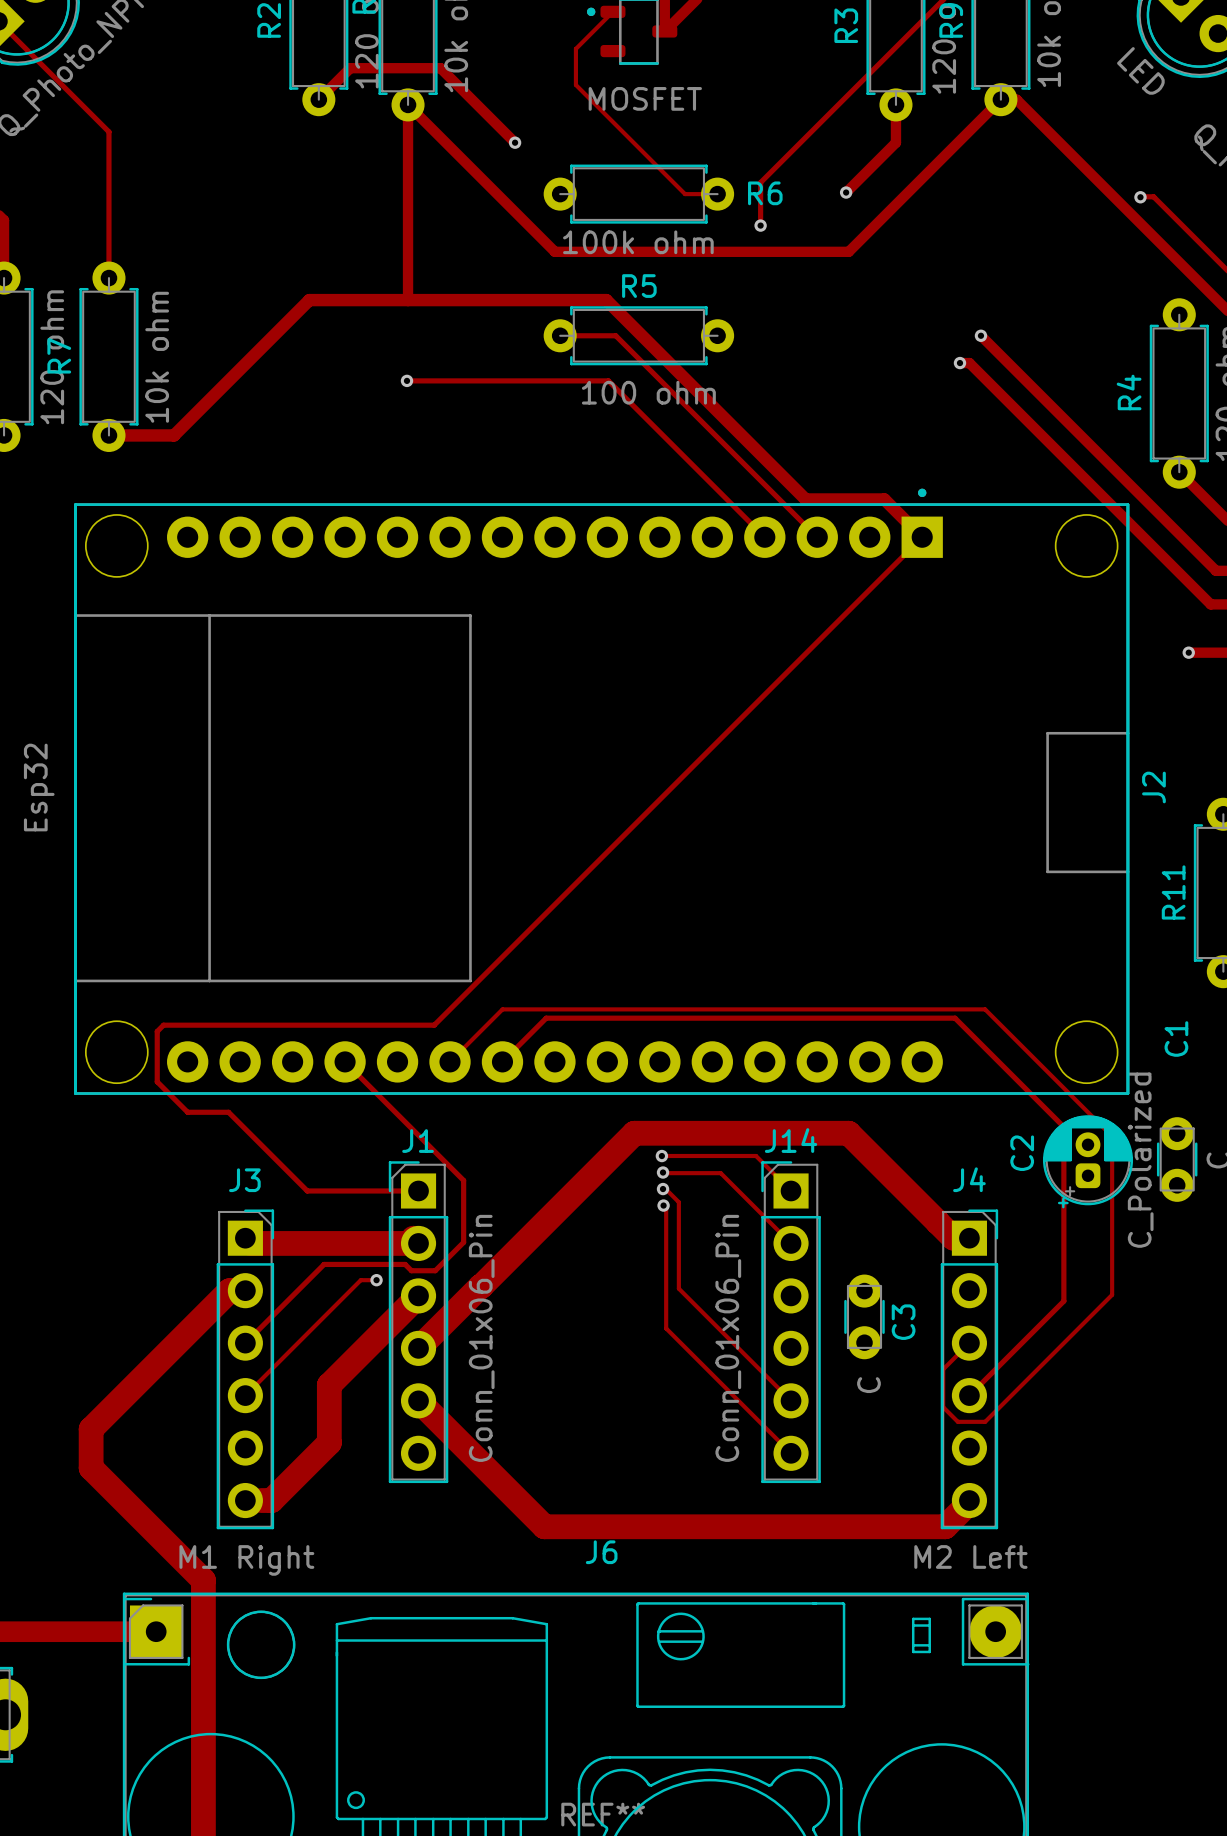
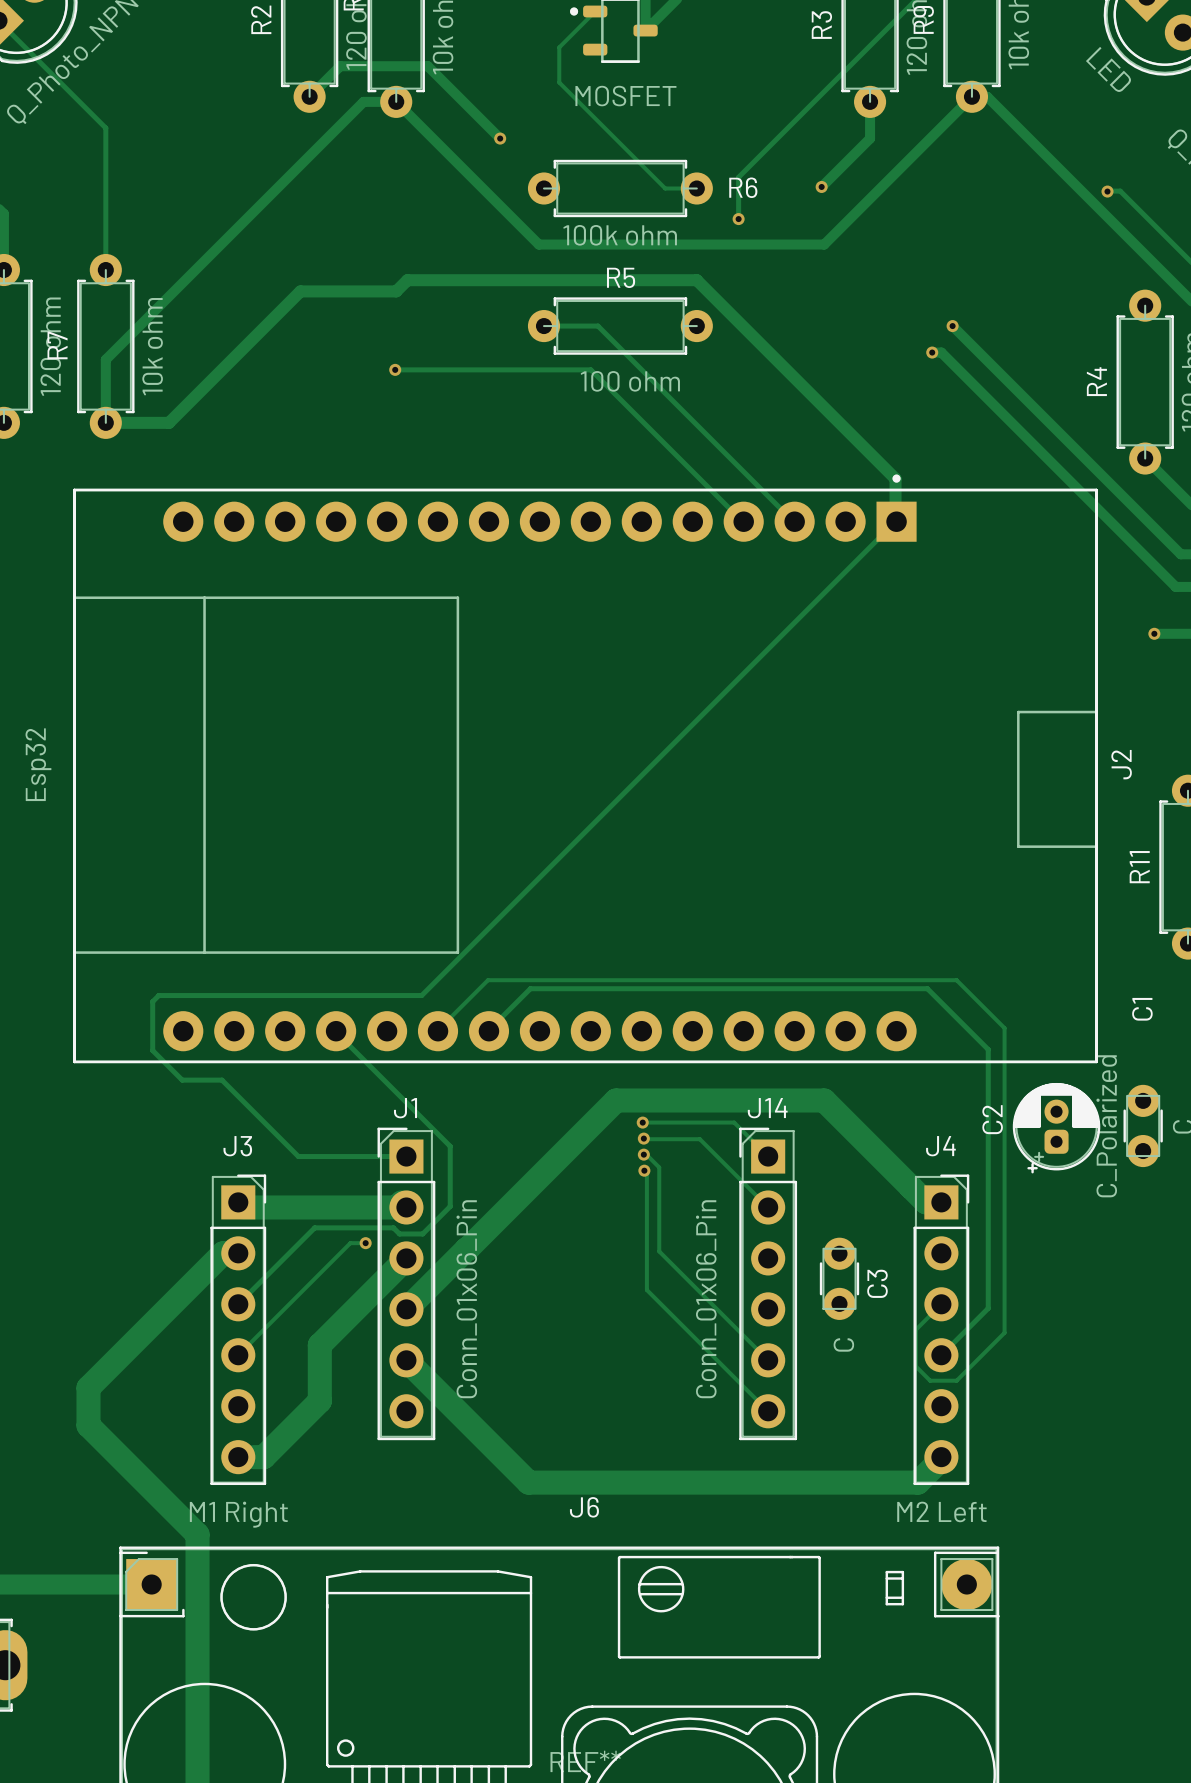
track: (408, 104) (408, 300) (606, 300) (805, 499) (884, 499) (922, 537) -> (396, 291) (407, 280) (696, 280) (895, 478) (895, 521)
track: none -> (396, 101) (363, 101) (105, 359) (105, 422)
J2 footprint: [74, 488, 1130, 1095] -> [73, 474, 1098, 1064]
track: (1034, 1058) (1112, 1136) (1112, 1294) (1034, 1372) -> (1004, 1028) (1004, 1332)
track: (1017, 1080) (1063, 1126) (1063, 1301) (1017, 1347) -> (988, 1049) (988, 1308)

